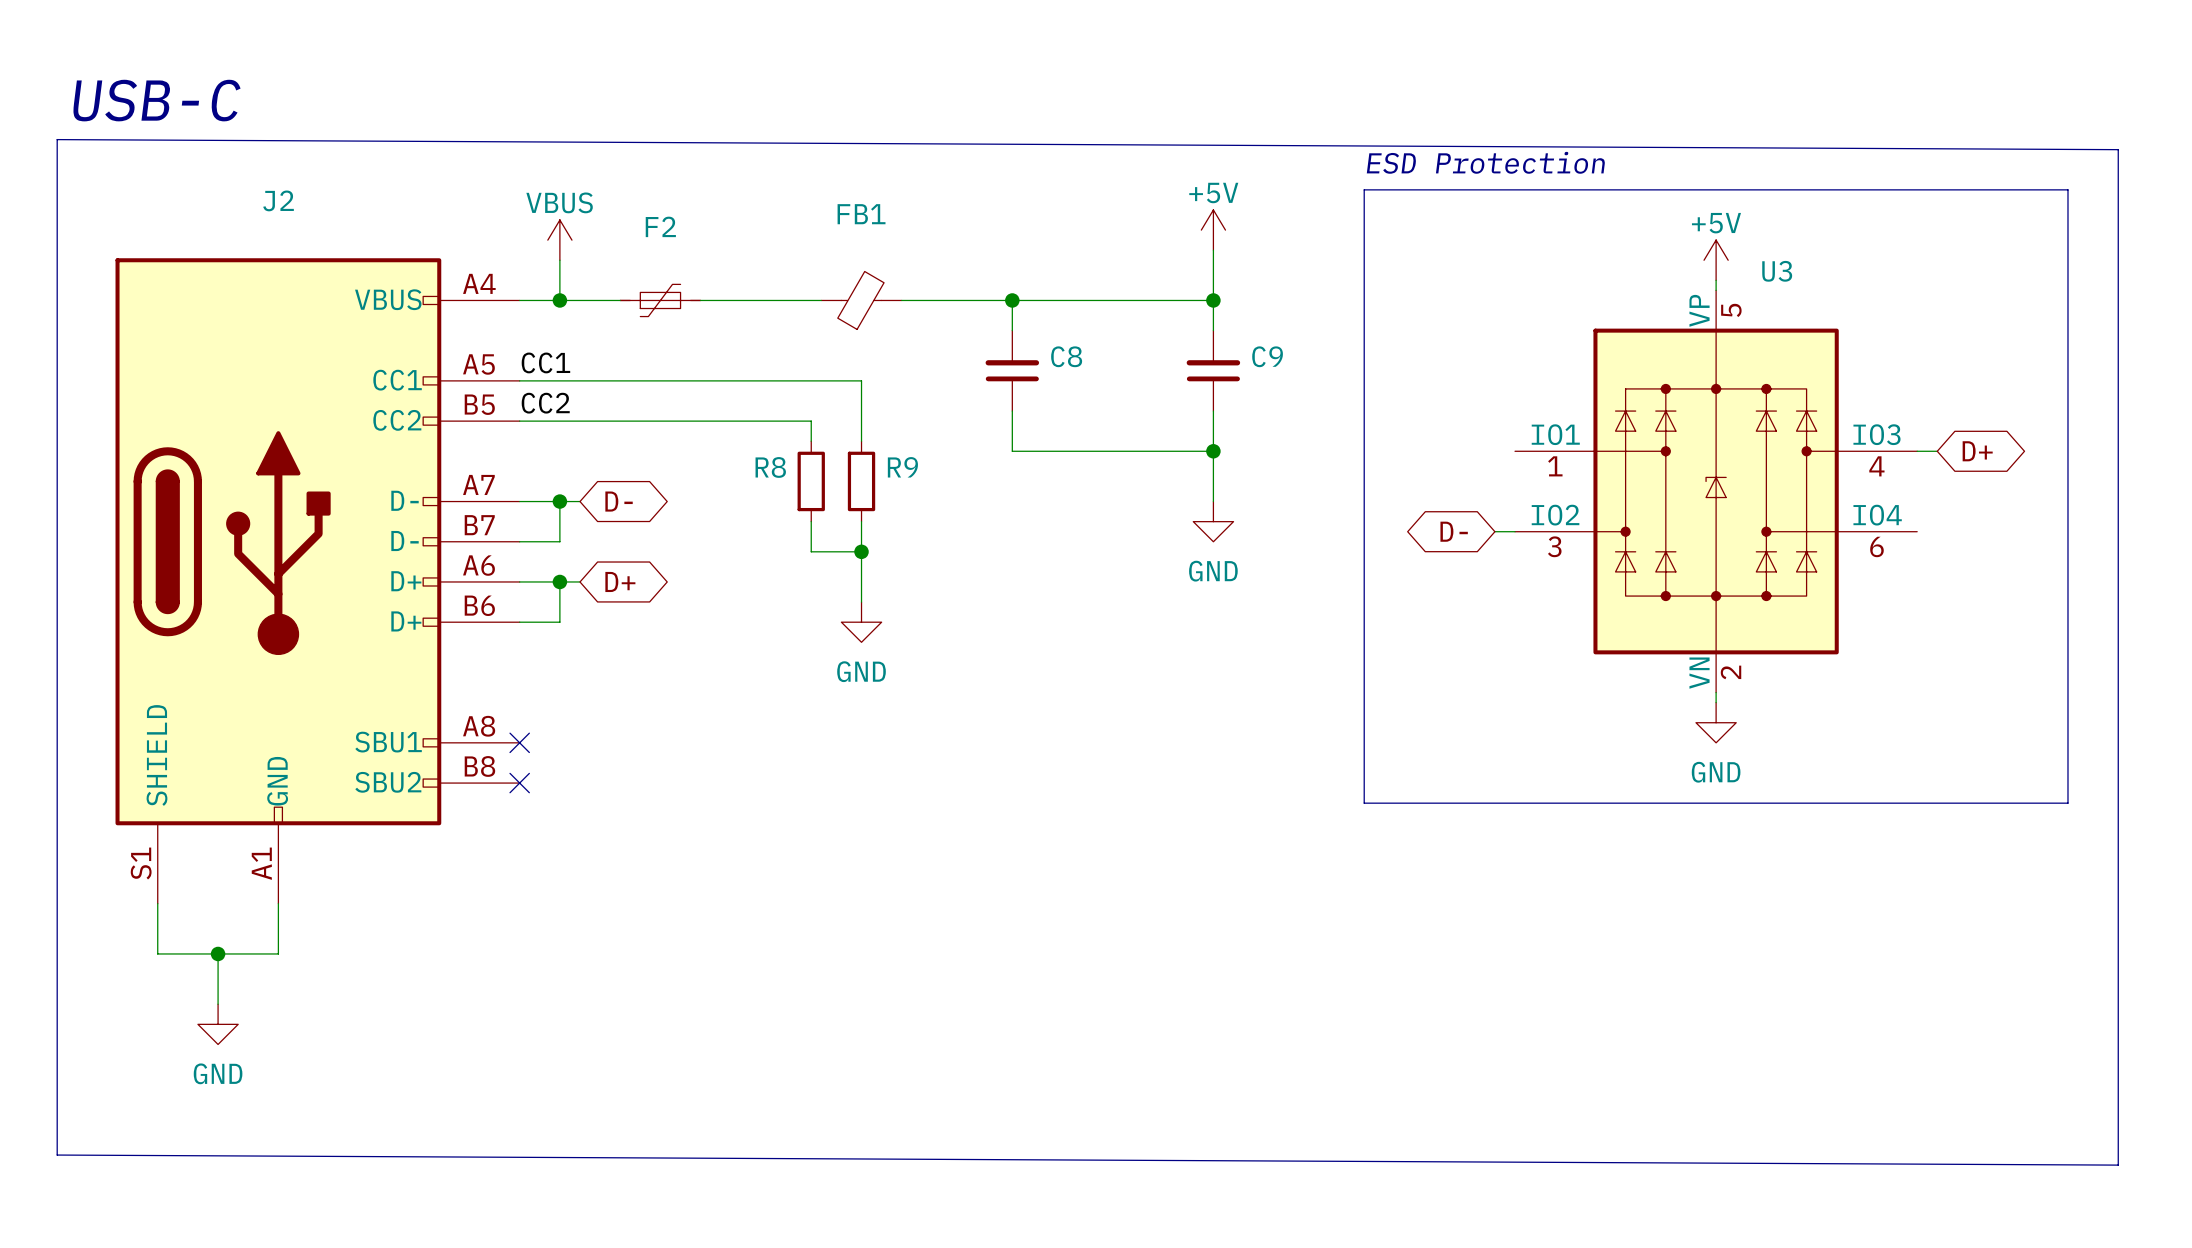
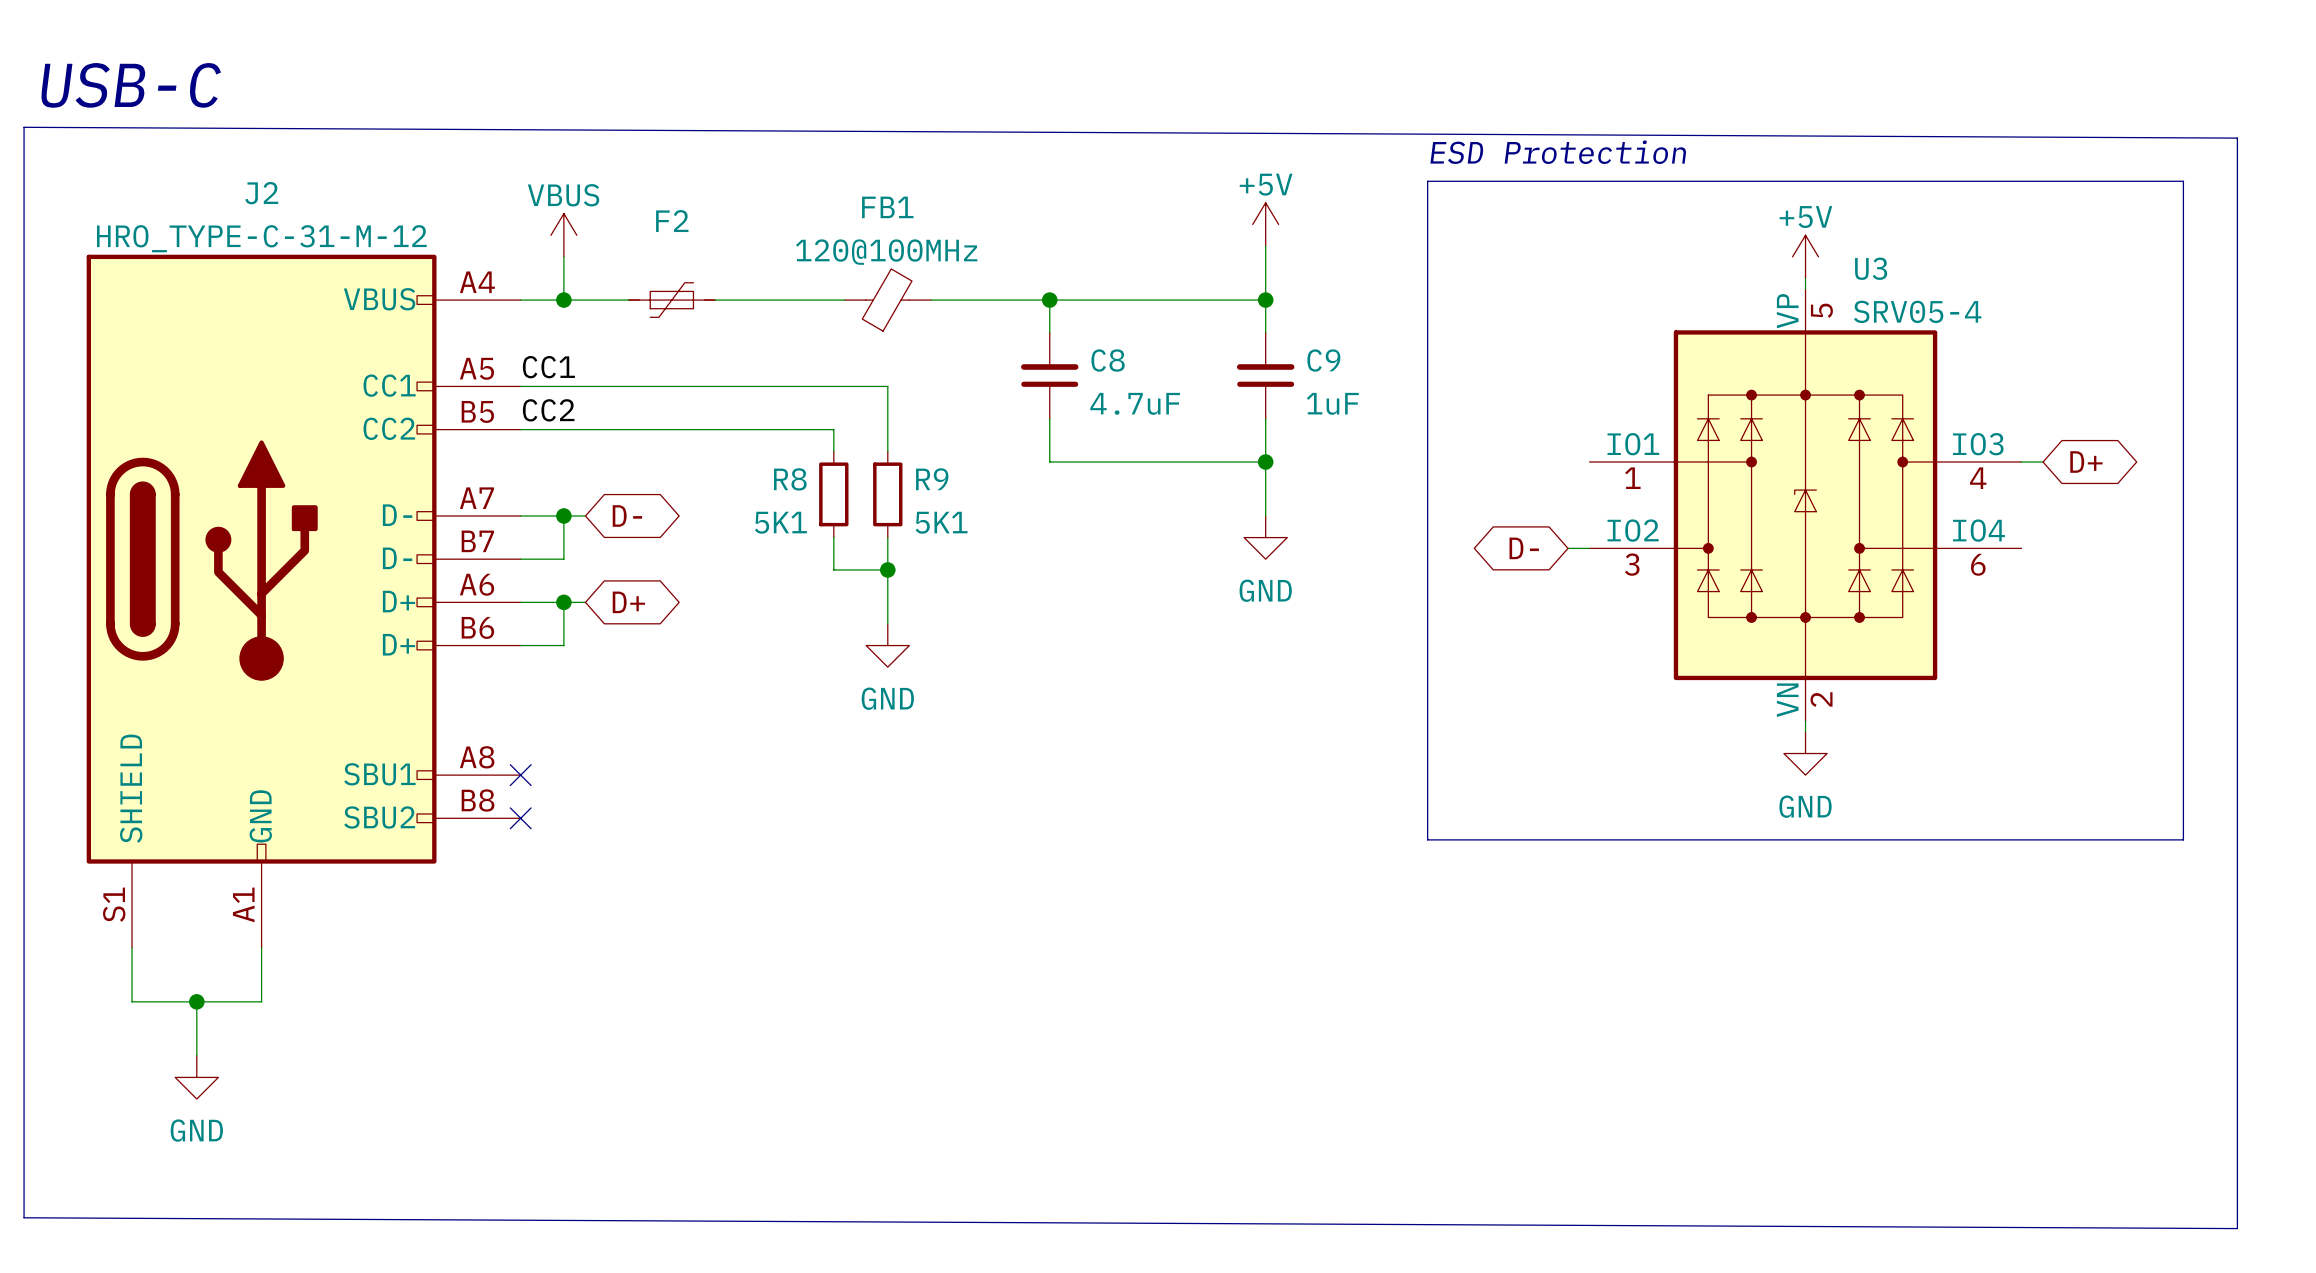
J2 value: none -> HRO_TYPE-C-31-M-12 (261, 238)
FB1 value: none -> 120@100MHz (886, 252)
U3 value: none -> SRV05-4 (1917, 311)
C8 value: none -> 4.7uF (1135, 403)
C9 value: none -> 1uF (1332, 403)
R8 value: none -> 5K1 (780, 522)
R9 value: none -> 5K1 (941, 522)

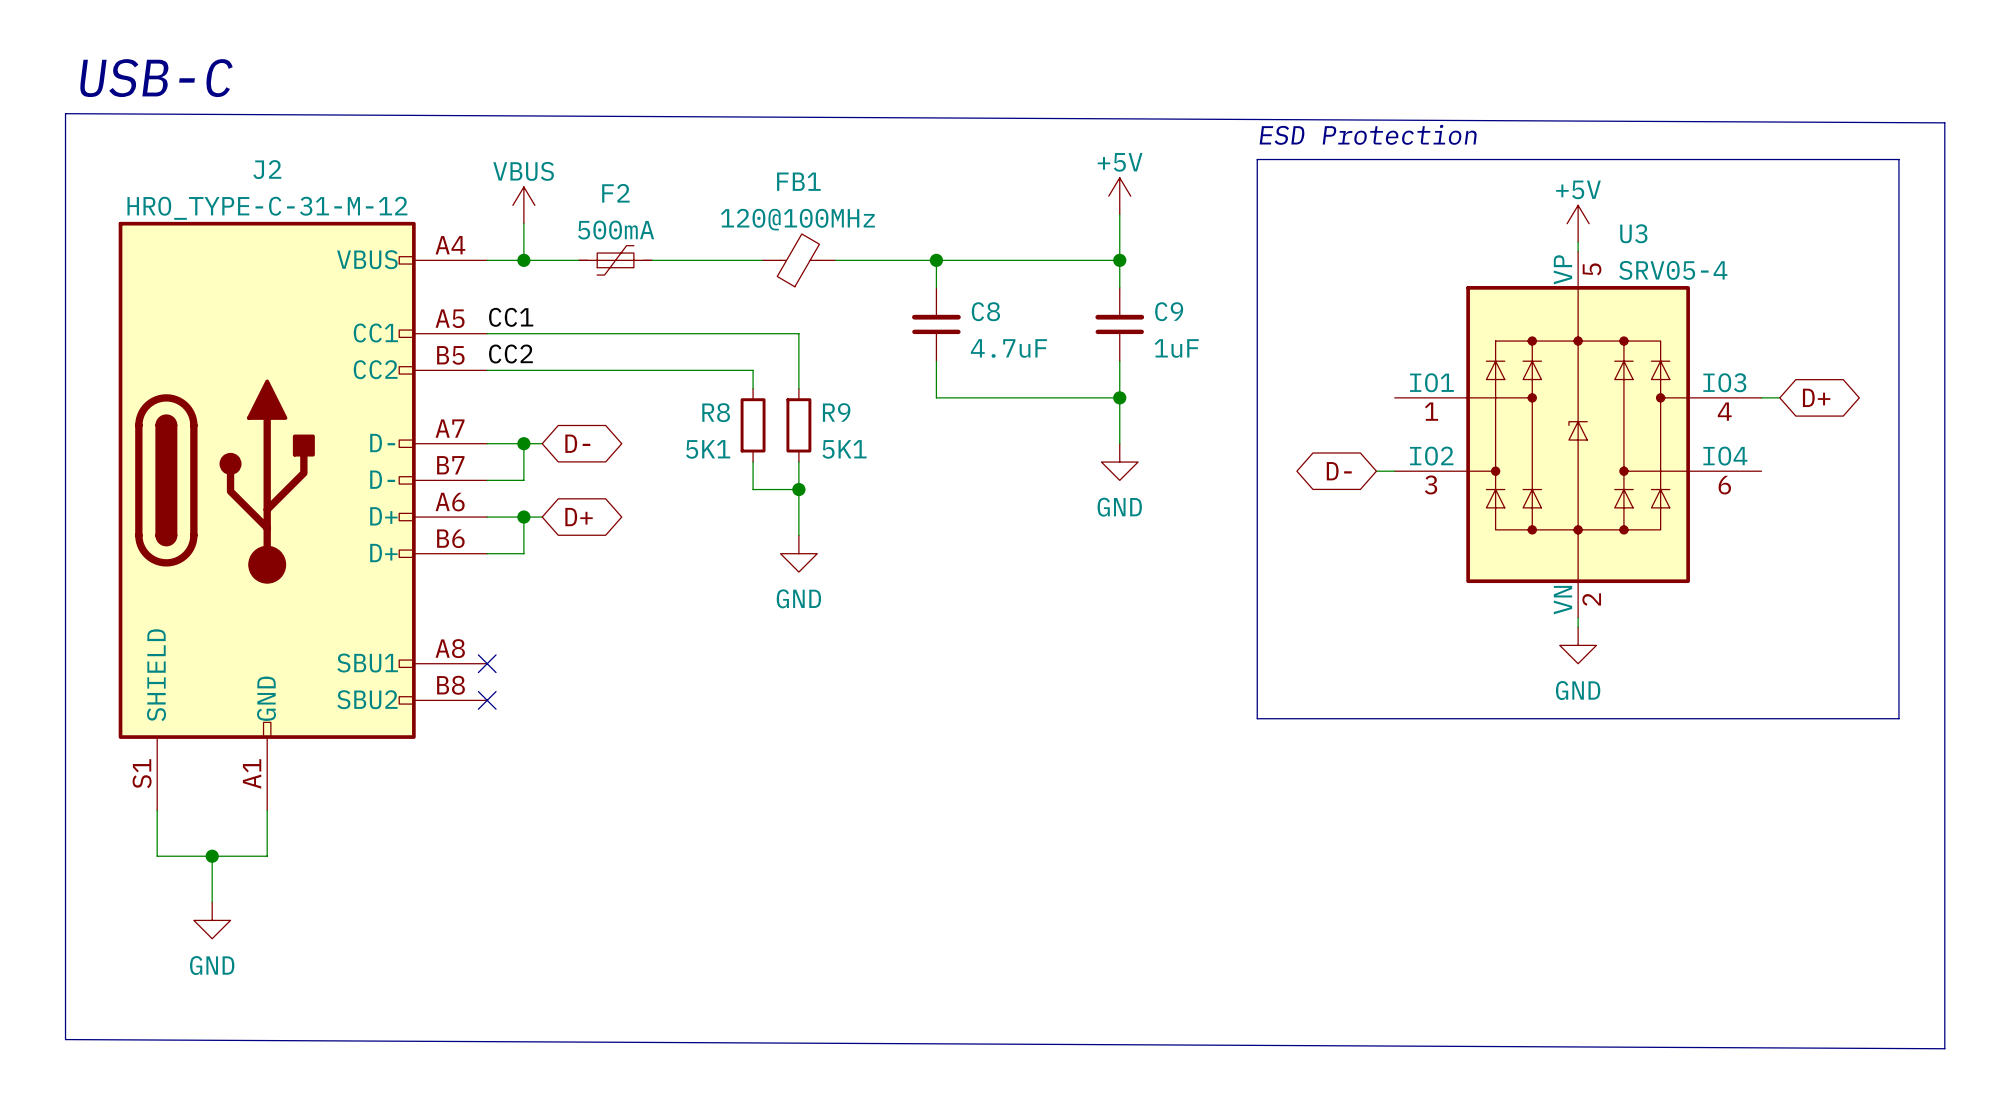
F2 value: none -> 500mA (616, 230)

